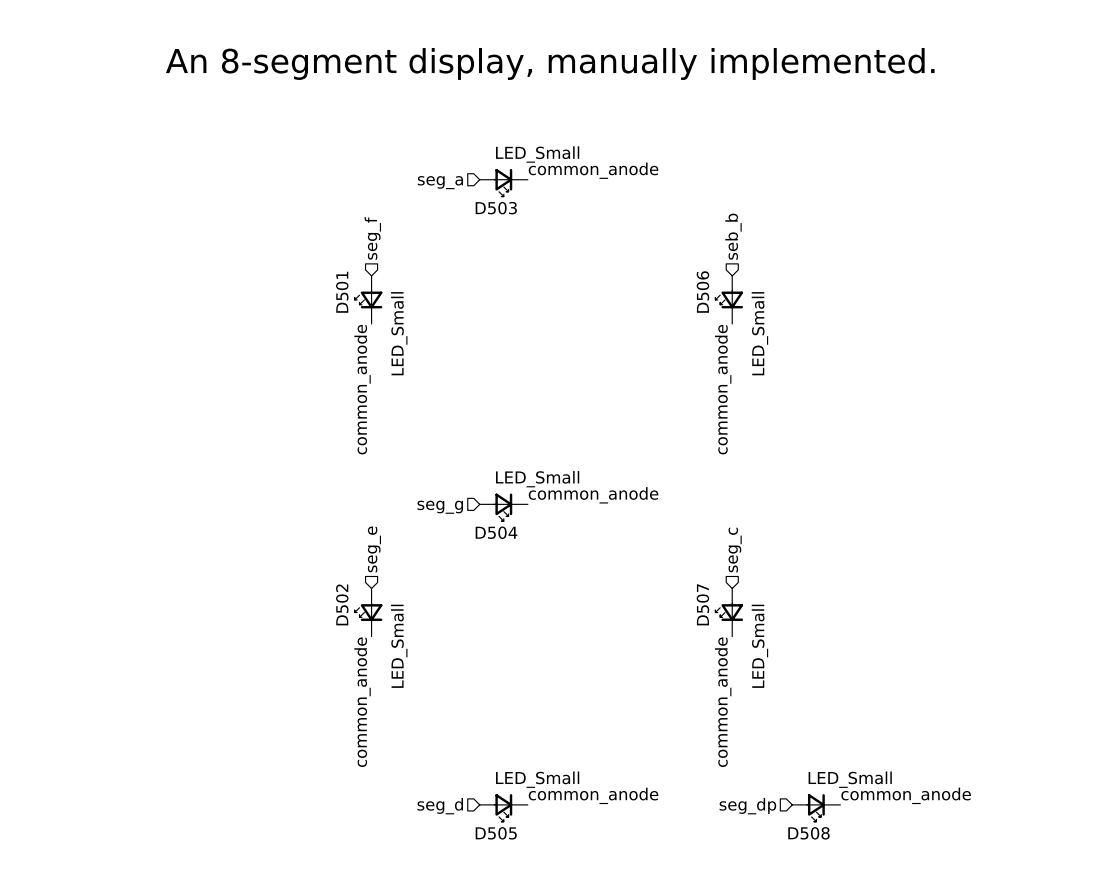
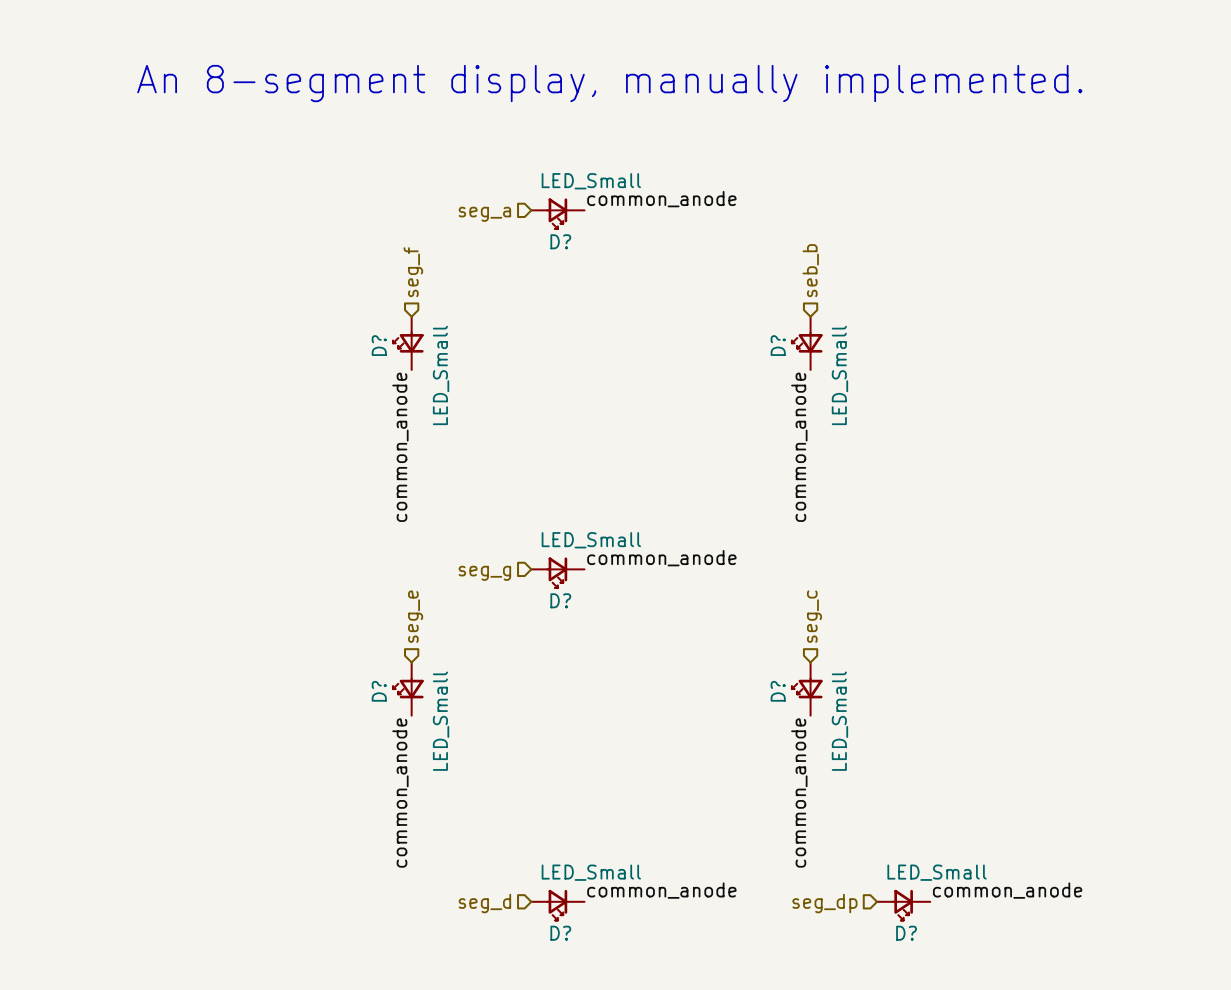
D503 name: D503 (496, 208) -> D? (560, 241)
D501 name: D501 (342, 292) -> D? (379, 345)
D506 name: D506 (702, 292) -> D? (778, 345)
D504 name: D504 (496, 532) -> D? (560, 600)
D502 name: D502 (342, 604) -> D? (379, 691)
D507 name: D507 (702, 604) -> D? (778, 691)
D505 name: D505 (496, 833) -> D? (560, 933)
D508 name: D508 (808, 833) -> D? (906, 933)

